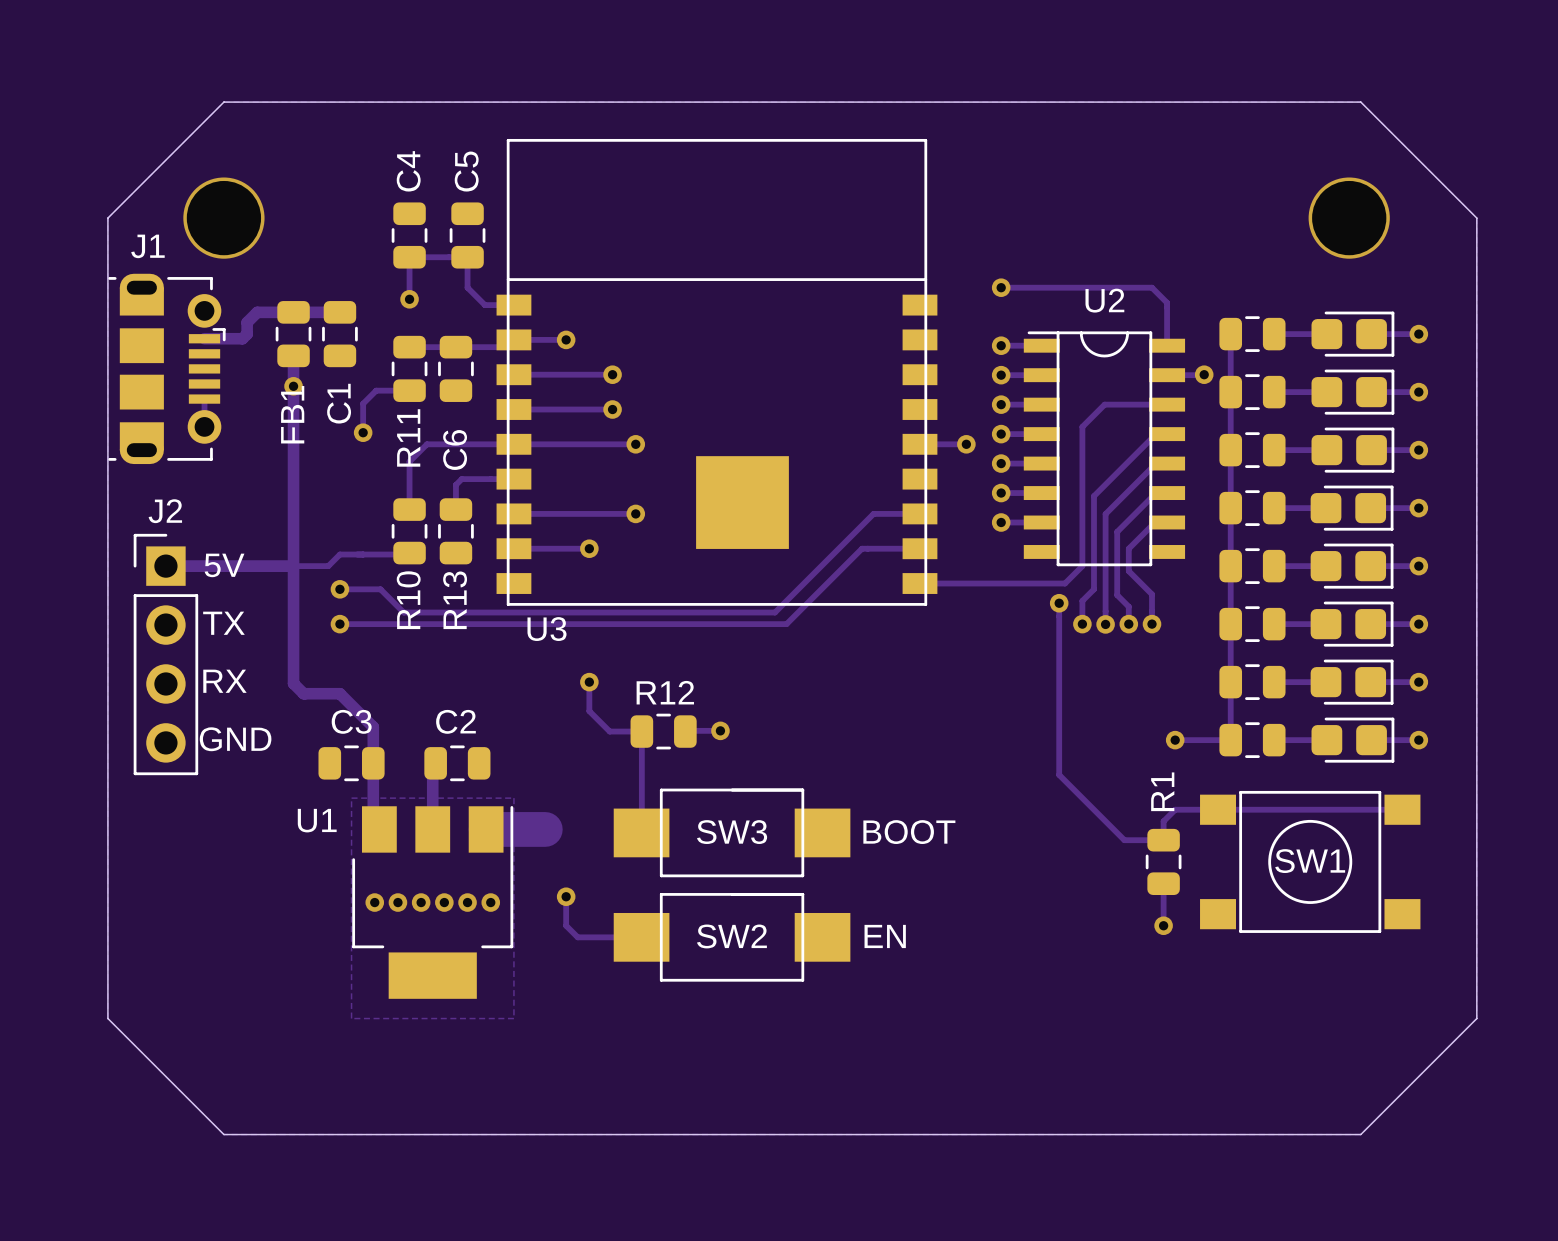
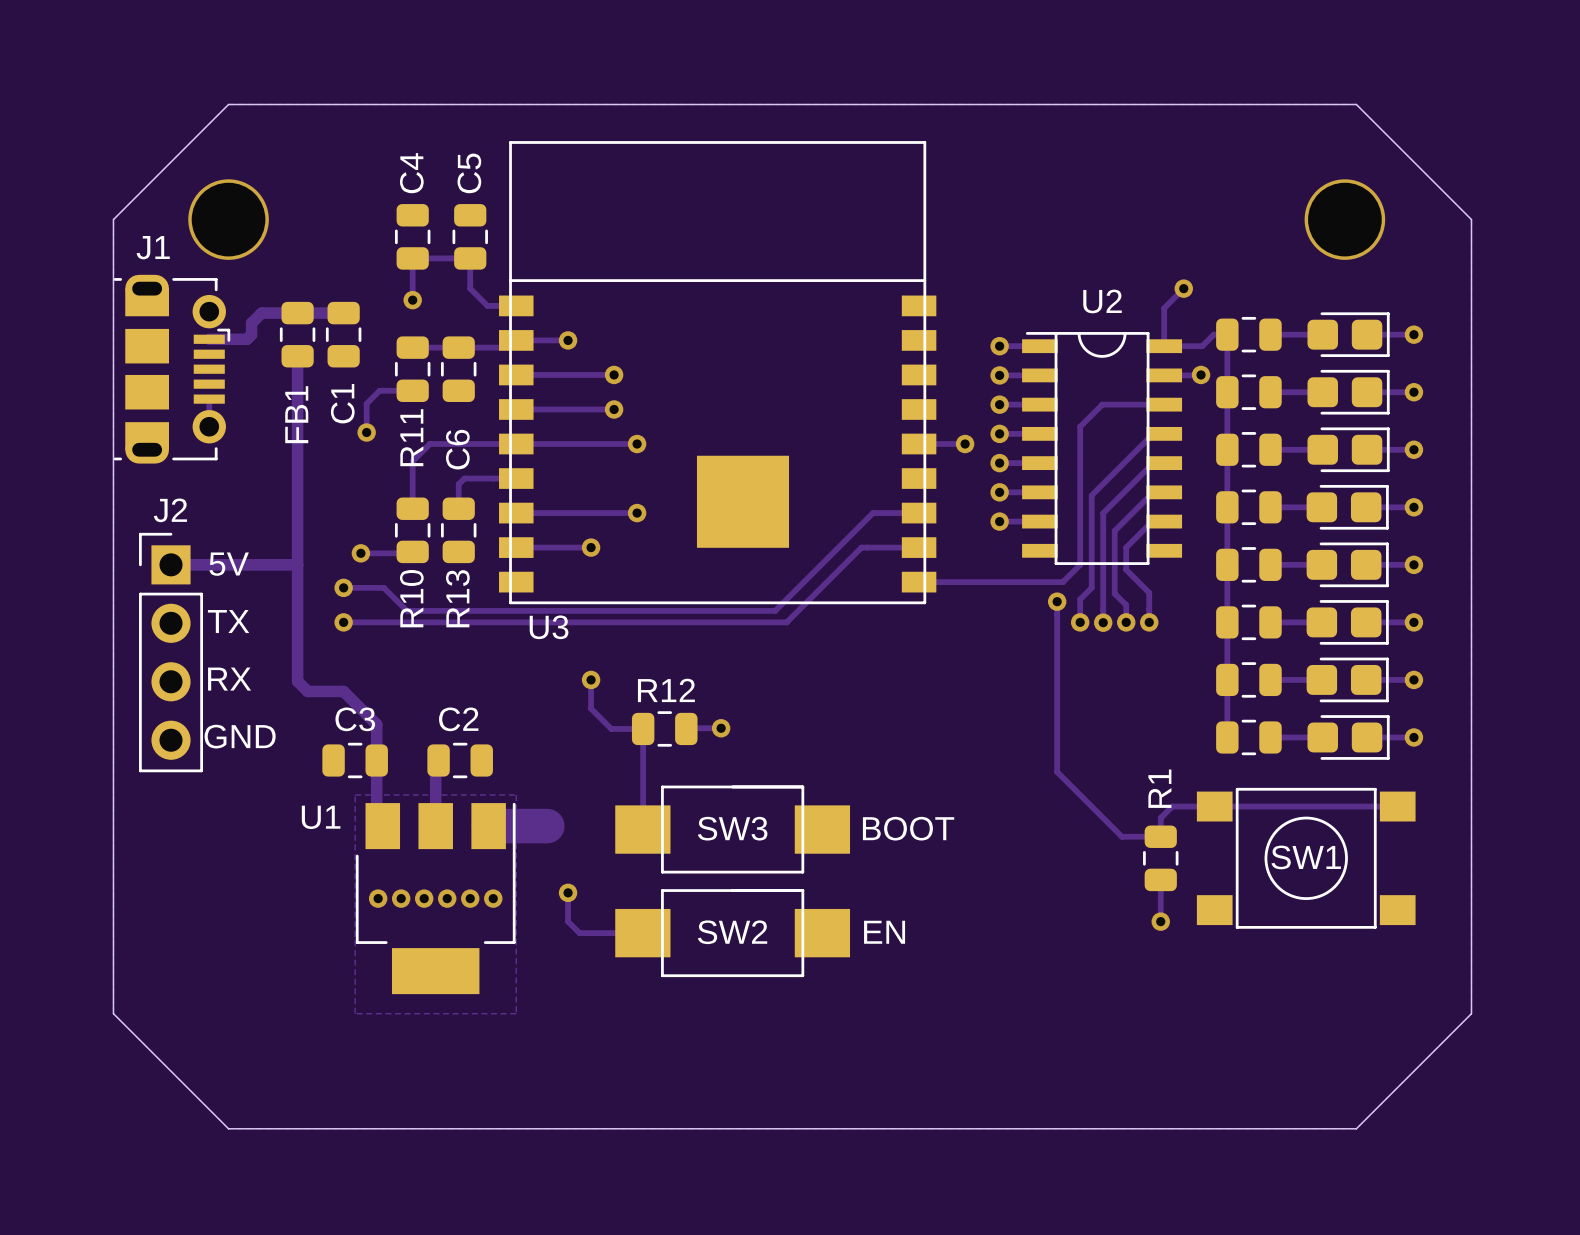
track: (1001, 287) (1152, 287) (1167, 302) (1167, 307) -> (1183, 288) (1164, 308)
via: (1001, 287) -> none
via: none -> (1183, 288)
track: none -> (1227, 334) (1213, 334) (1202, 346) (1164, 346)
via: (293, 386) -> none
track: (357, 554) (339, 554) (328, 566) (293, 566) -> none
via: none -> (360, 553)
track: (1175, 740) (1230, 740) -> none
via: (1175, 740) -> none

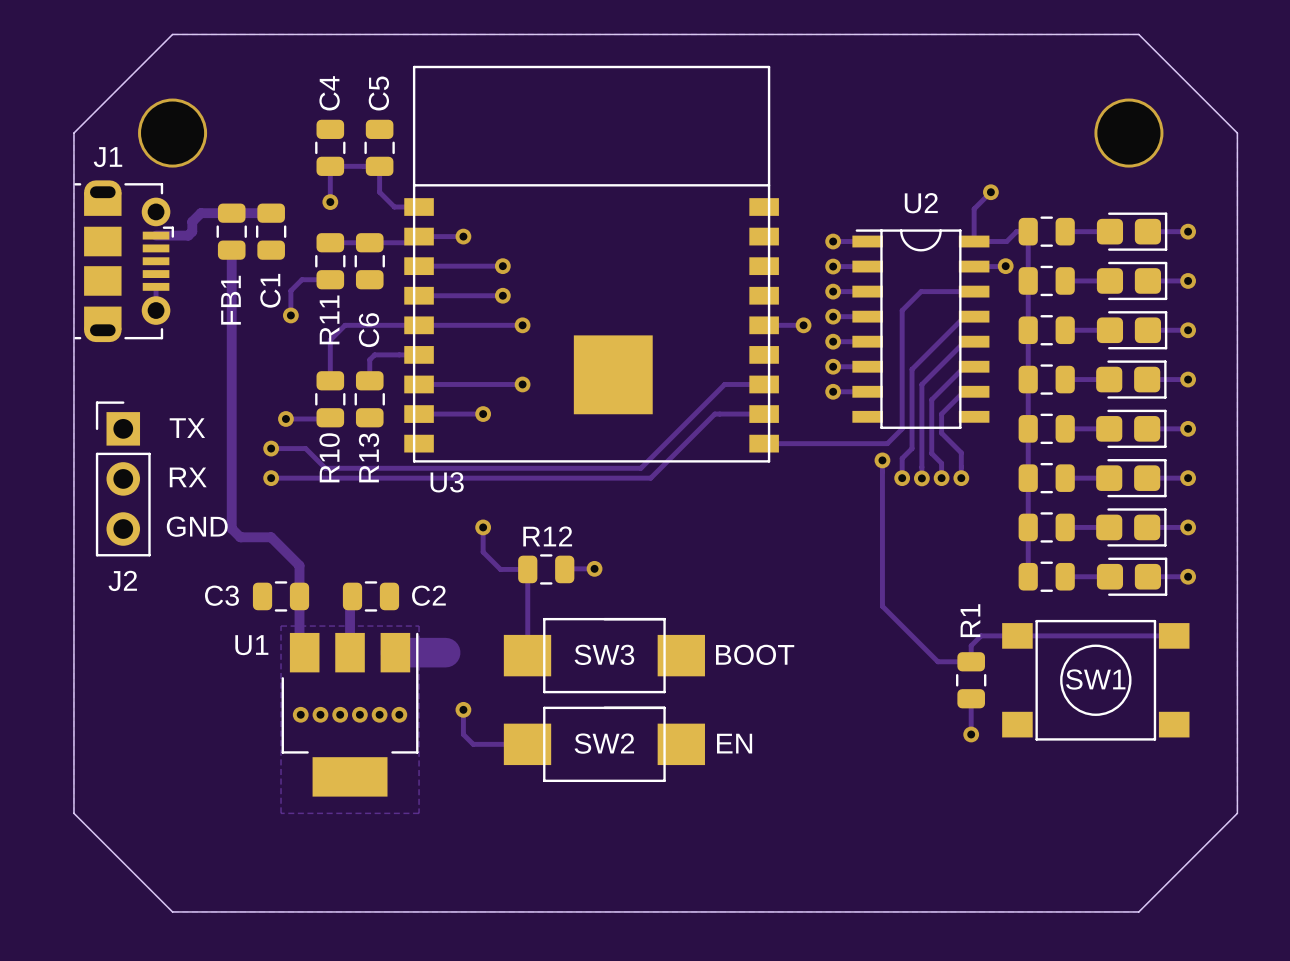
J2 name position: J2 (170, 510) -> J2 (122, 580)
J2 footprint: [139, 532, 204, 773] -> [95, 401, 151, 557]
track: (171, 564) (297, 564) -> none
text: 5V (229, 564) -> TX (187, 428)
text: TX (228, 621) -> RX (188, 477)
text: RX (229, 679) -> none
C3 name position: C3 (355, 719) -> C3 (221, 595)
C2 name position: C2 (458, 719) -> C2 (428, 595)
text position: GND (240, 736) -> GND (197, 526)

